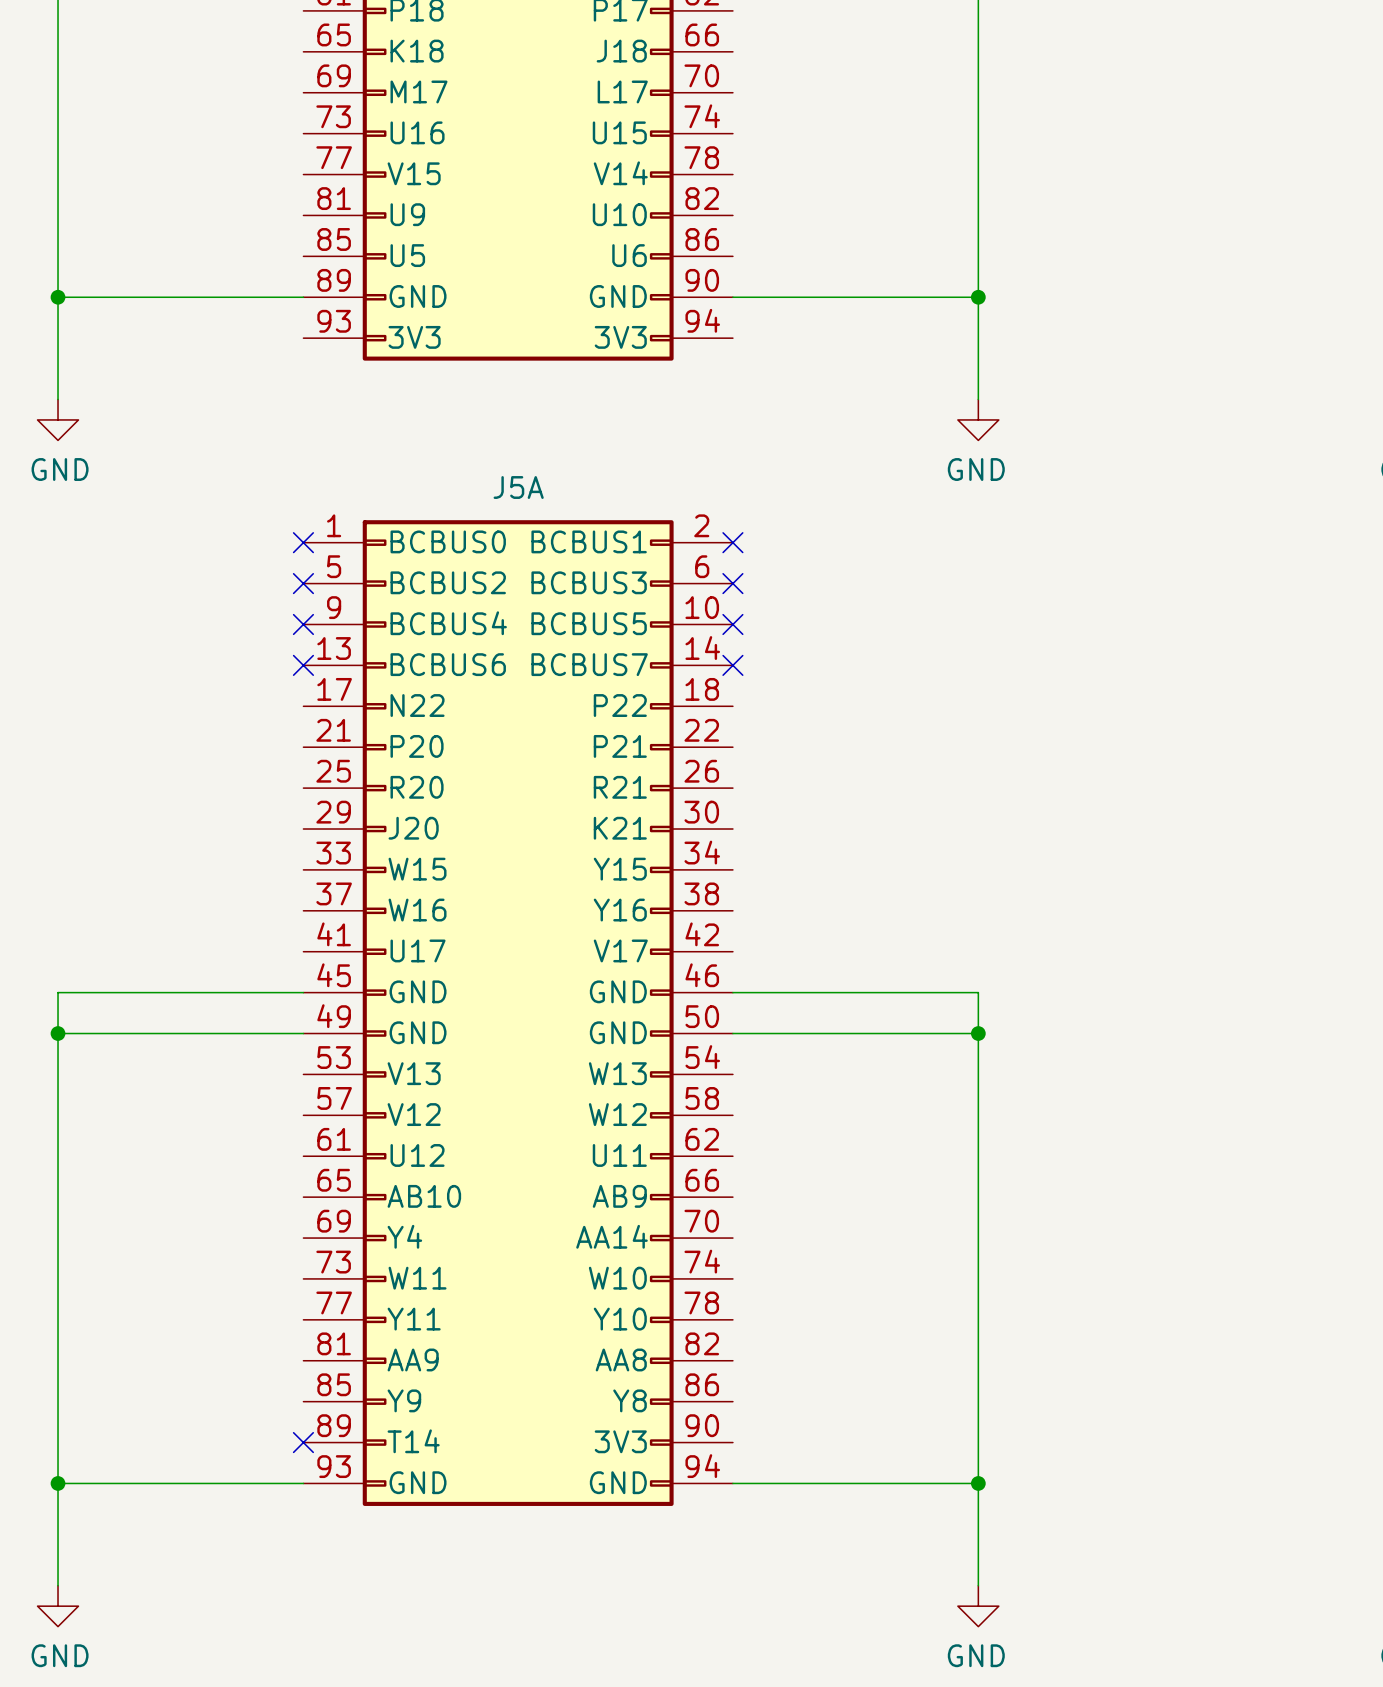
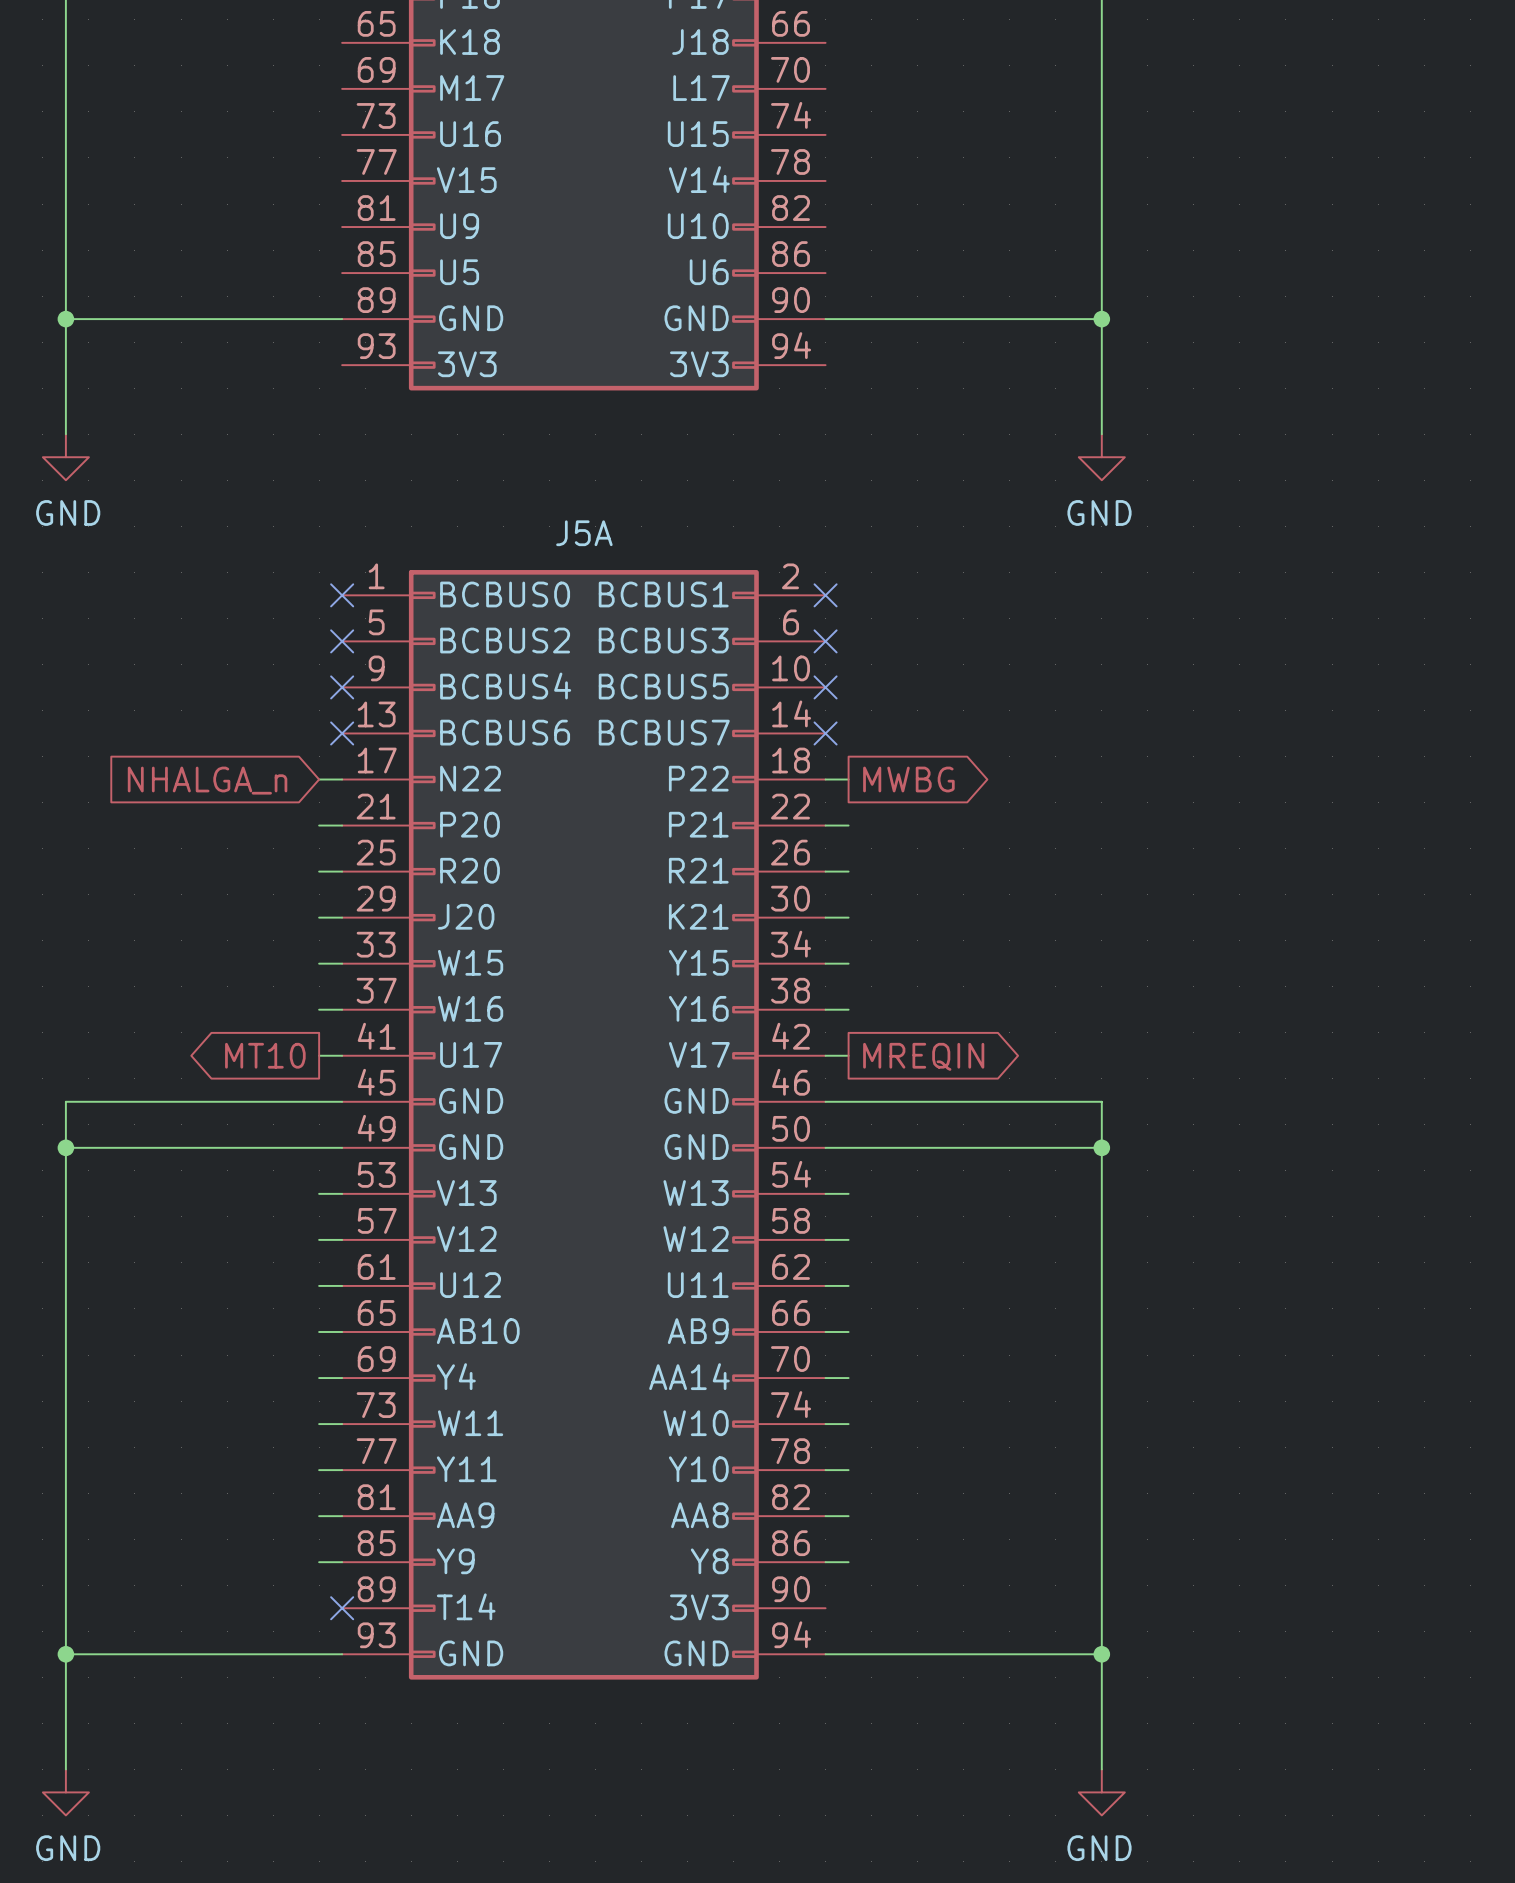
wire: none -> (319, 779) (342, 779)
wire: none -> (825, 779) (848, 779)
global label: none -> MWBG (908, 779)
global label: none -> NHALGA_n (207, 780)
wire: none -> (319, 825) (342, 825)
wire: none -> (825, 825) (848, 825)
wire: none -> (319, 871) (342, 871)
wire: none -> (825, 871) (848, 871)
wire: none -> (319, 917) (342, 917)
wire: none -> (825, 917) (848, 917)
wire: none -> (319, 963) (342, 963)
wire: none -> (825, 963) (848, 963)
wire: none -> (319, 1009) (342, 1009)
wire: none -> (825, 1009) (848, 1009)
global label: none -> MT10 (265, 1055)
wire: none -> (319, 1055) (342, 1055)
wire: none -> (825, 1055) (848, 1055)
global label: none -> MREQIN (923, 1056)
wire: none -> (319, 1193) (342, 1193)
wire: none -> (825, 1193) (848, 1193)
wire: none -> (319, 1239) (342, 1239)
wire: none -> (825, 1239) (848, 1239)
wire: none -> (319, 1285) (342, 1285)
wire: none -> (825, 1285) (848, 1285)
wire: none -> (319, 1331) (342, 1331)
wire: none -> (825, 1331) (848, 1331)
wire: none -> (319, 1378) (342, 1378)
wire: none -> (825, 1378) (848, 1378)
wire: none -> (319, 1424) (342, 1424)
wire: none -> (825, 1424) (848, 1424)
wire: none -> (319, 1470) (342, 1470)
wire: none -> (825, 1470) (848, 1470)
wire: none -> (319, 1516) (342, 1516)
wire: none -> (825, 1516) (848, 1516)
wire: none -> (319, 1562) (342, 1562)
wire: none -> (825, 1562) (848, 1562)

